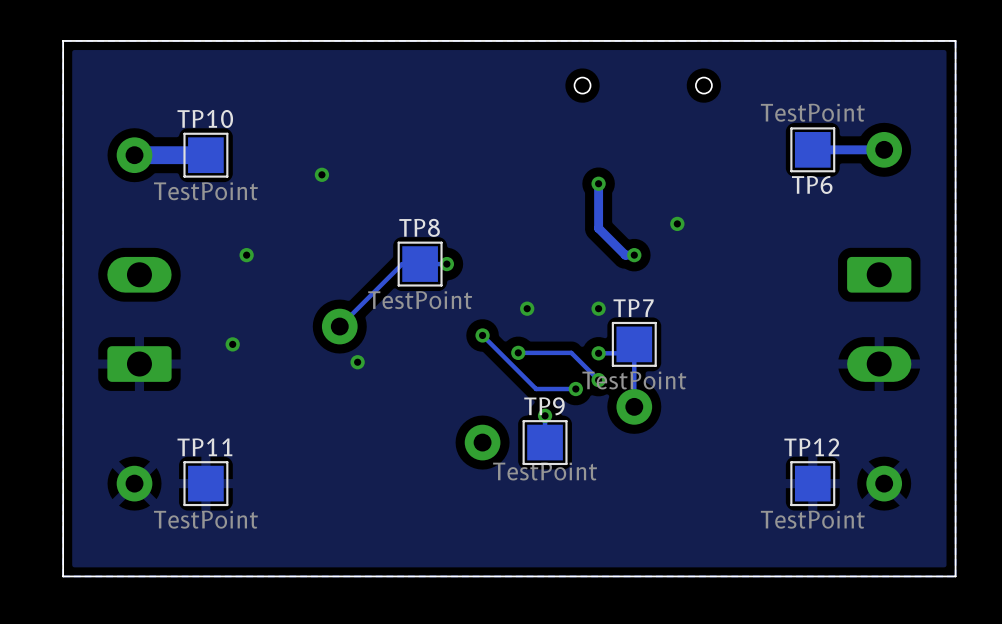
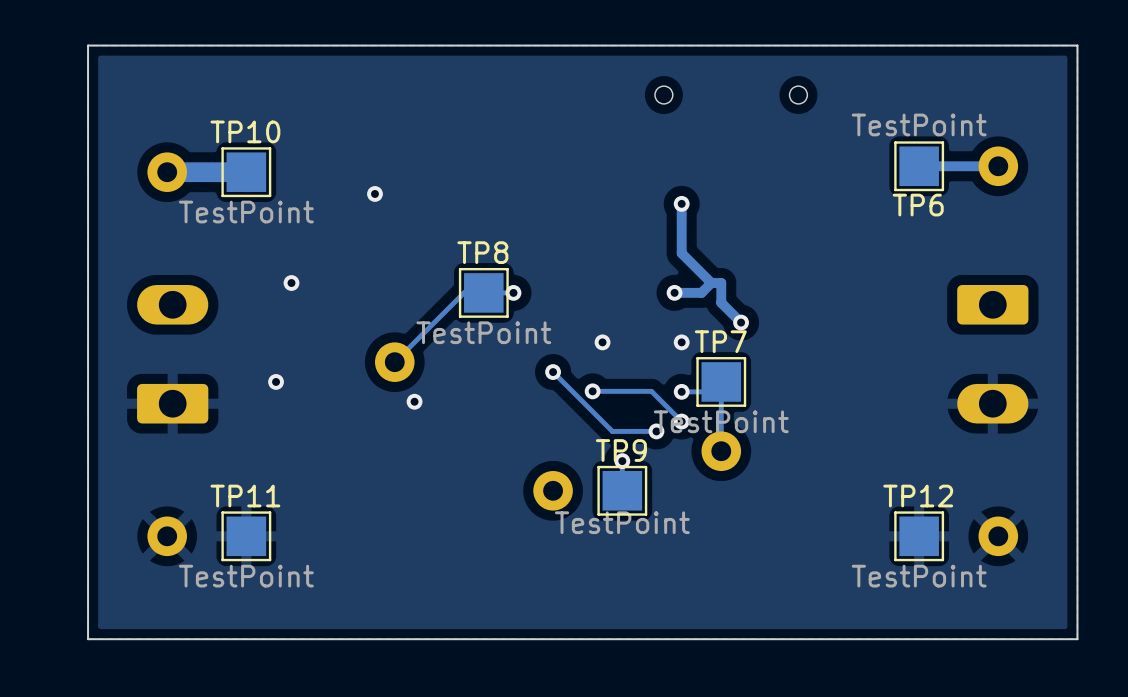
via: (677, 223) -> none
track: none -> (711, 283) (701, 292) (674, 292)
track: none -> (721, 283) (721, 302) (741, 322)
via: (634, 255) -> none
via: none -> (674, 292)
via: none -> (741, 322)

